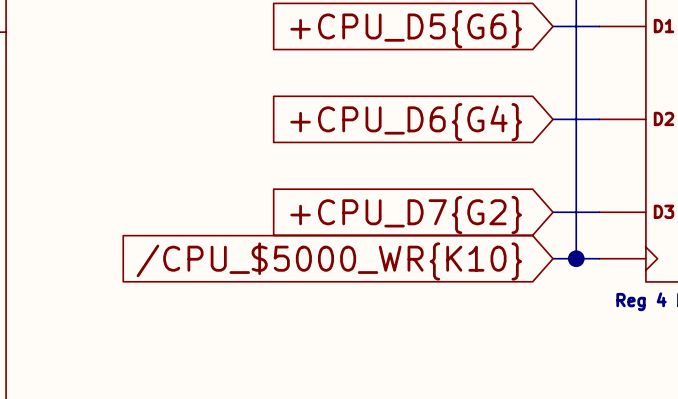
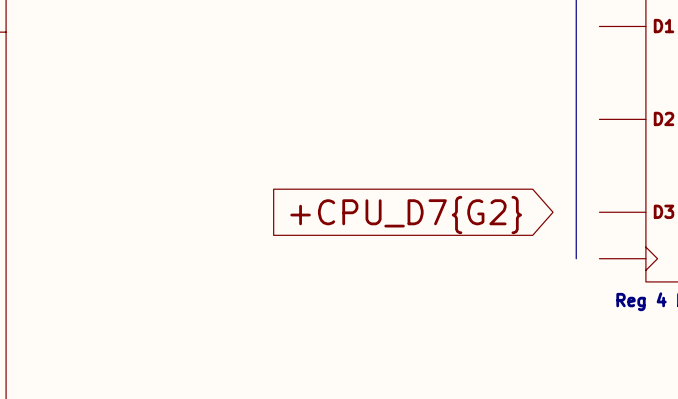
wire: (553, 26) (599, 26) -> none
global label: +CPU_D5{G6} (406, 29) -> none
wire: (553, 119) (599, 119) -> none
global label: +CPU_D6{G4} (406, 122) -> none
wire: (553, 212) (599, 212) -> none
wire: (553, 258) (599, 258) -> none
junction: (576, 258) -> none
global label: /CPU_$5000_WR{K10} (329, 261) -> none

